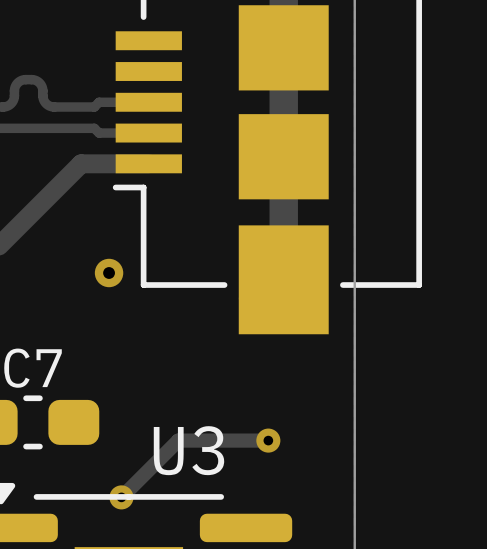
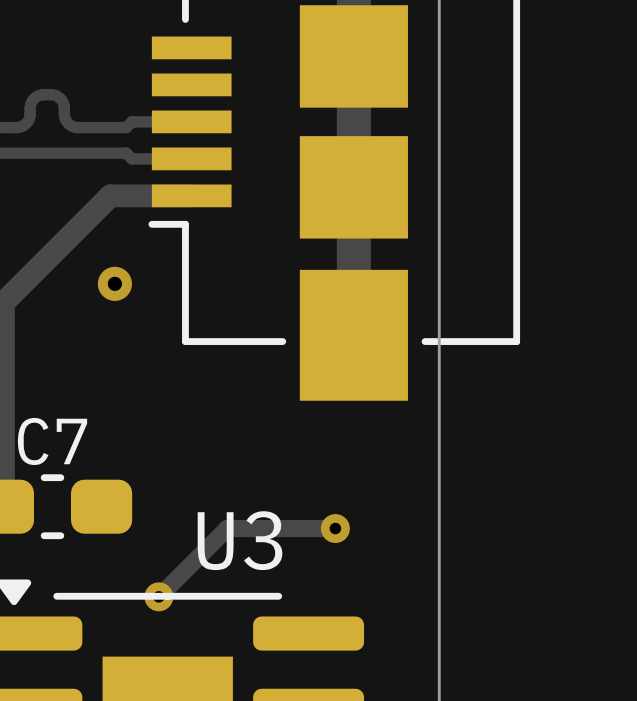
via position: (109, 272) -> (114, 283)

